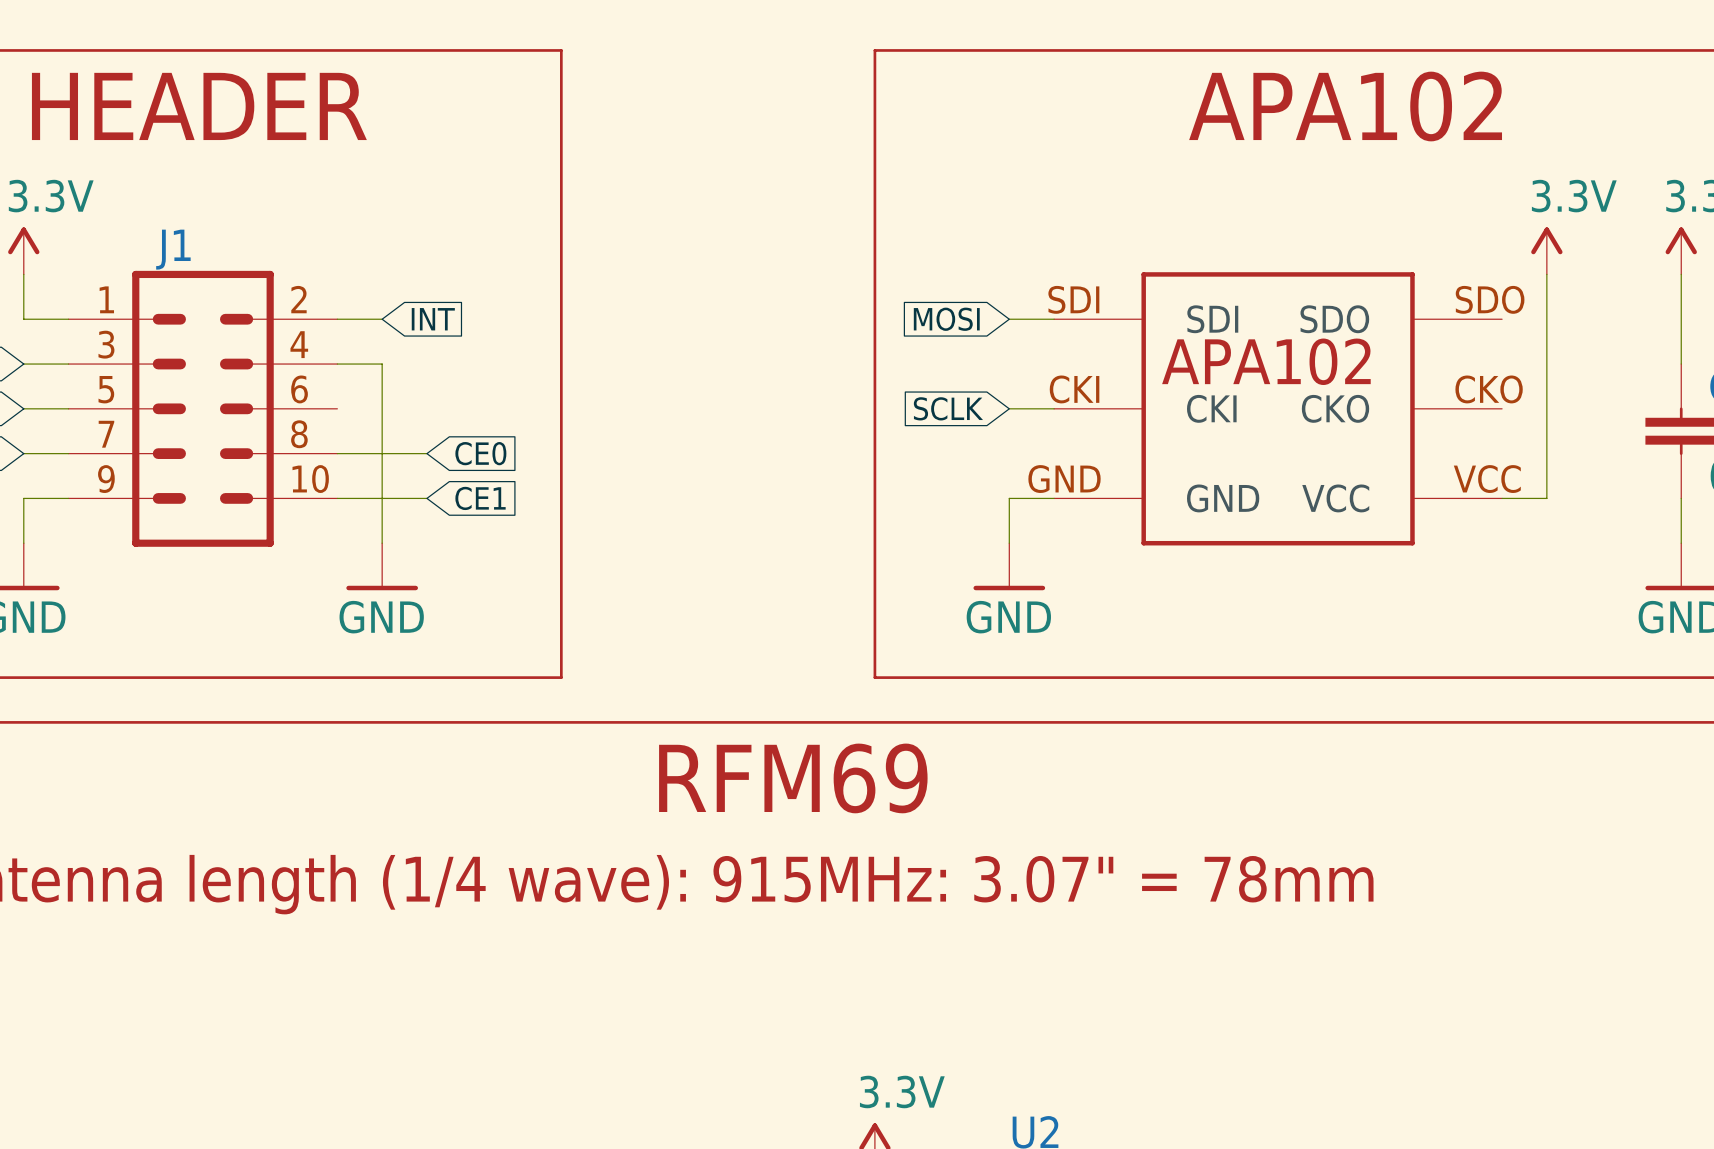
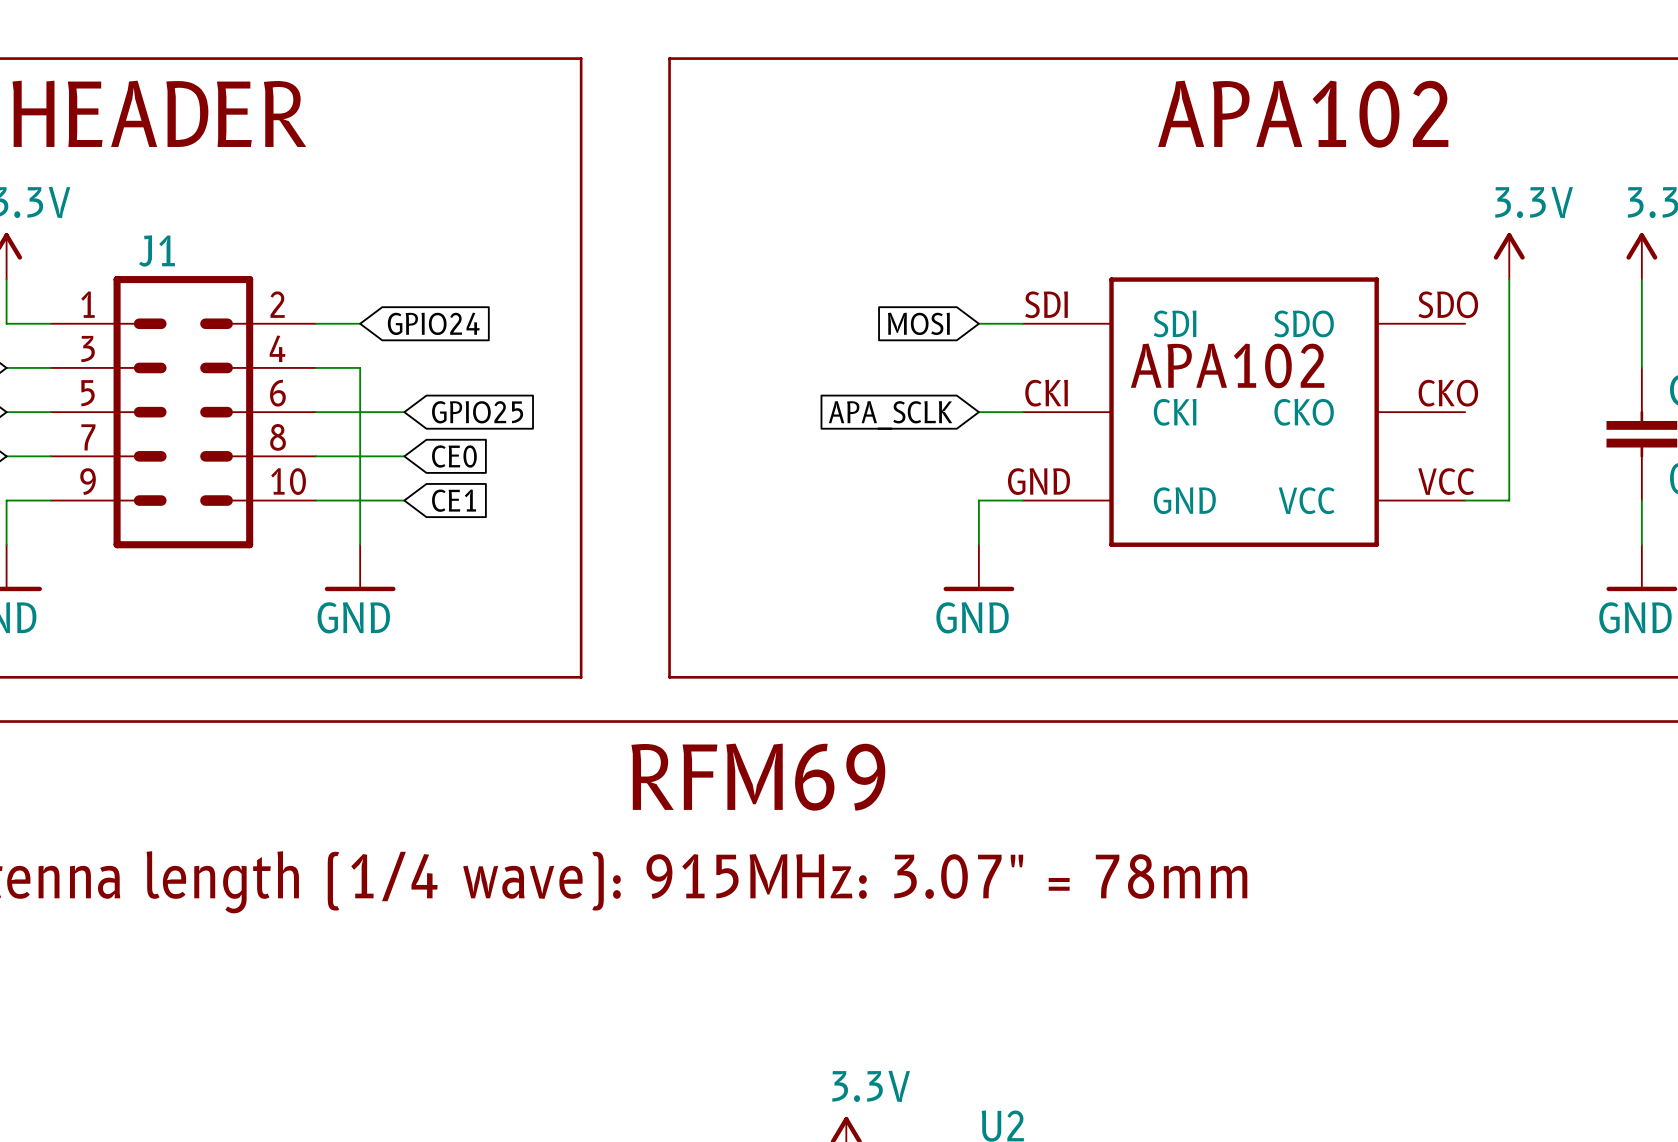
line: (561, 50) (561, 677) -> (536, 58) (581, 58) (581, 677) (536, 677)
line: (874, 50) (874, 677) -> (846, 58) (669, 58) (669, 677) (846, 677)
global label: INT (433, 319) -> GPIO24 (433, 323)
wire: none -> (315, 412) (404, 412)
global label: none -> GPIO25 (477, 412)
global label: SCLK (948, 408) -> APA_SCLK (890, 415)

